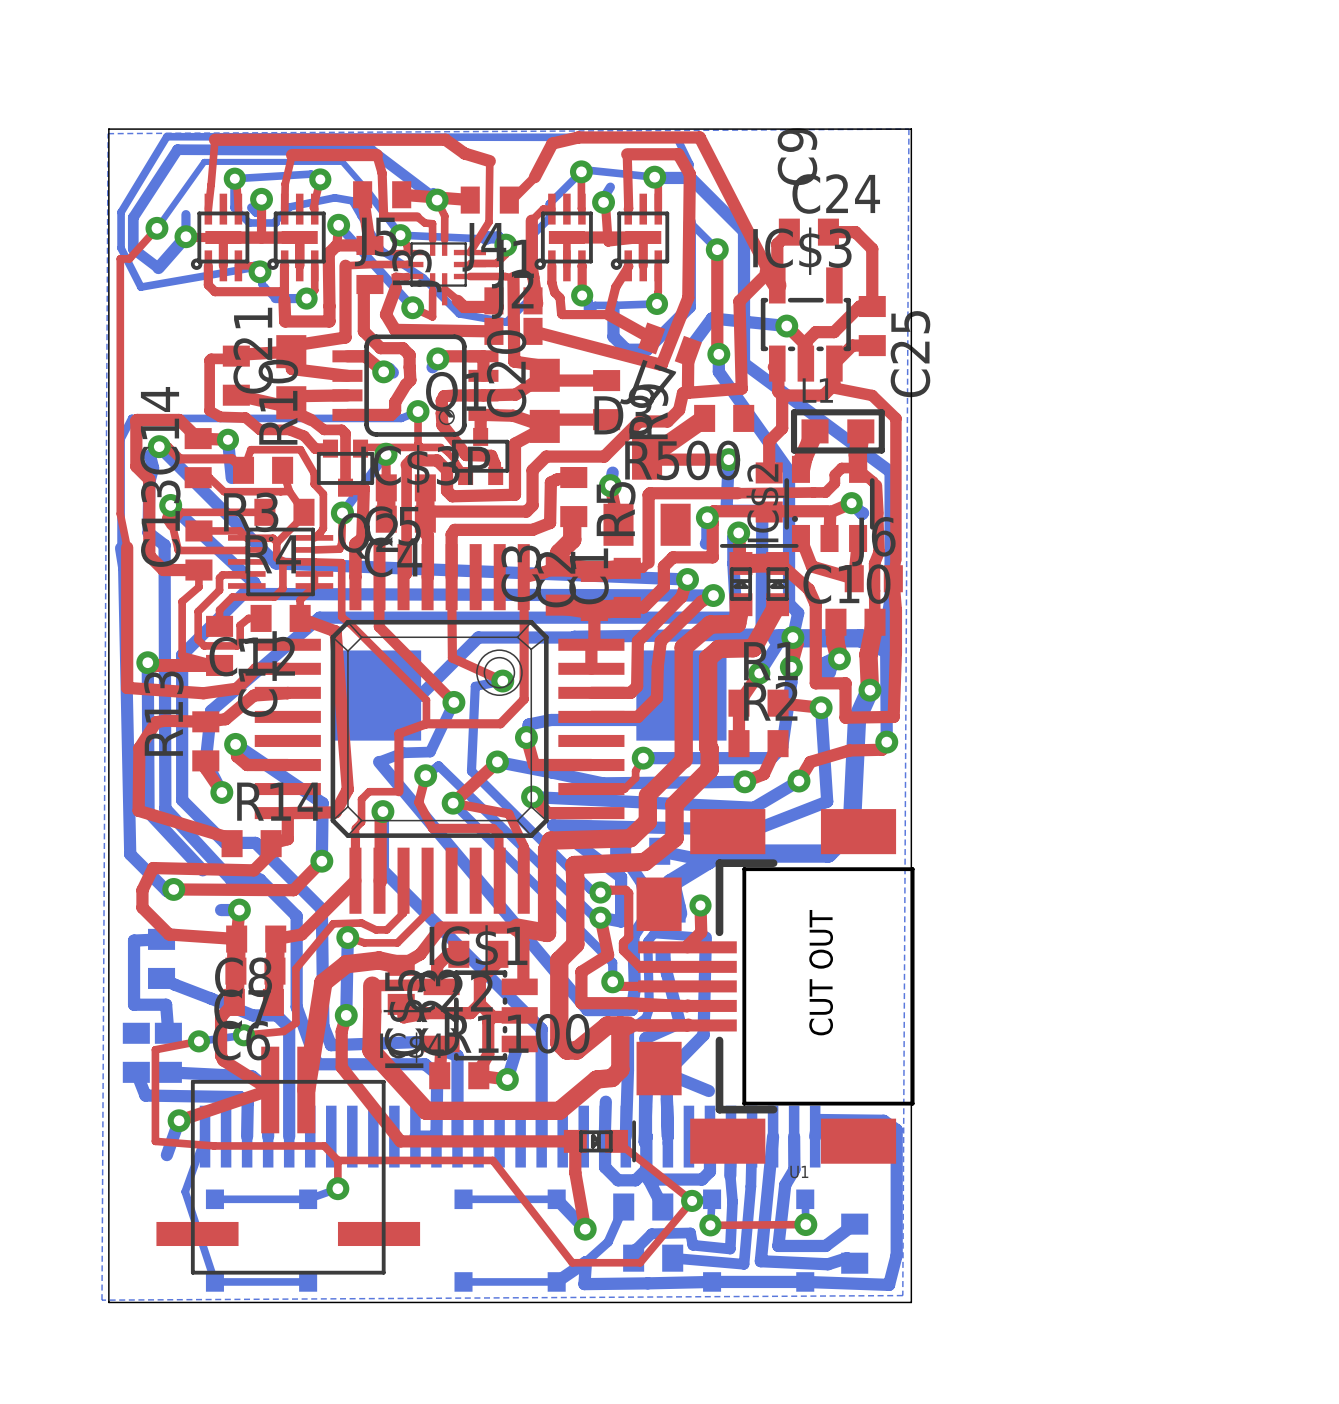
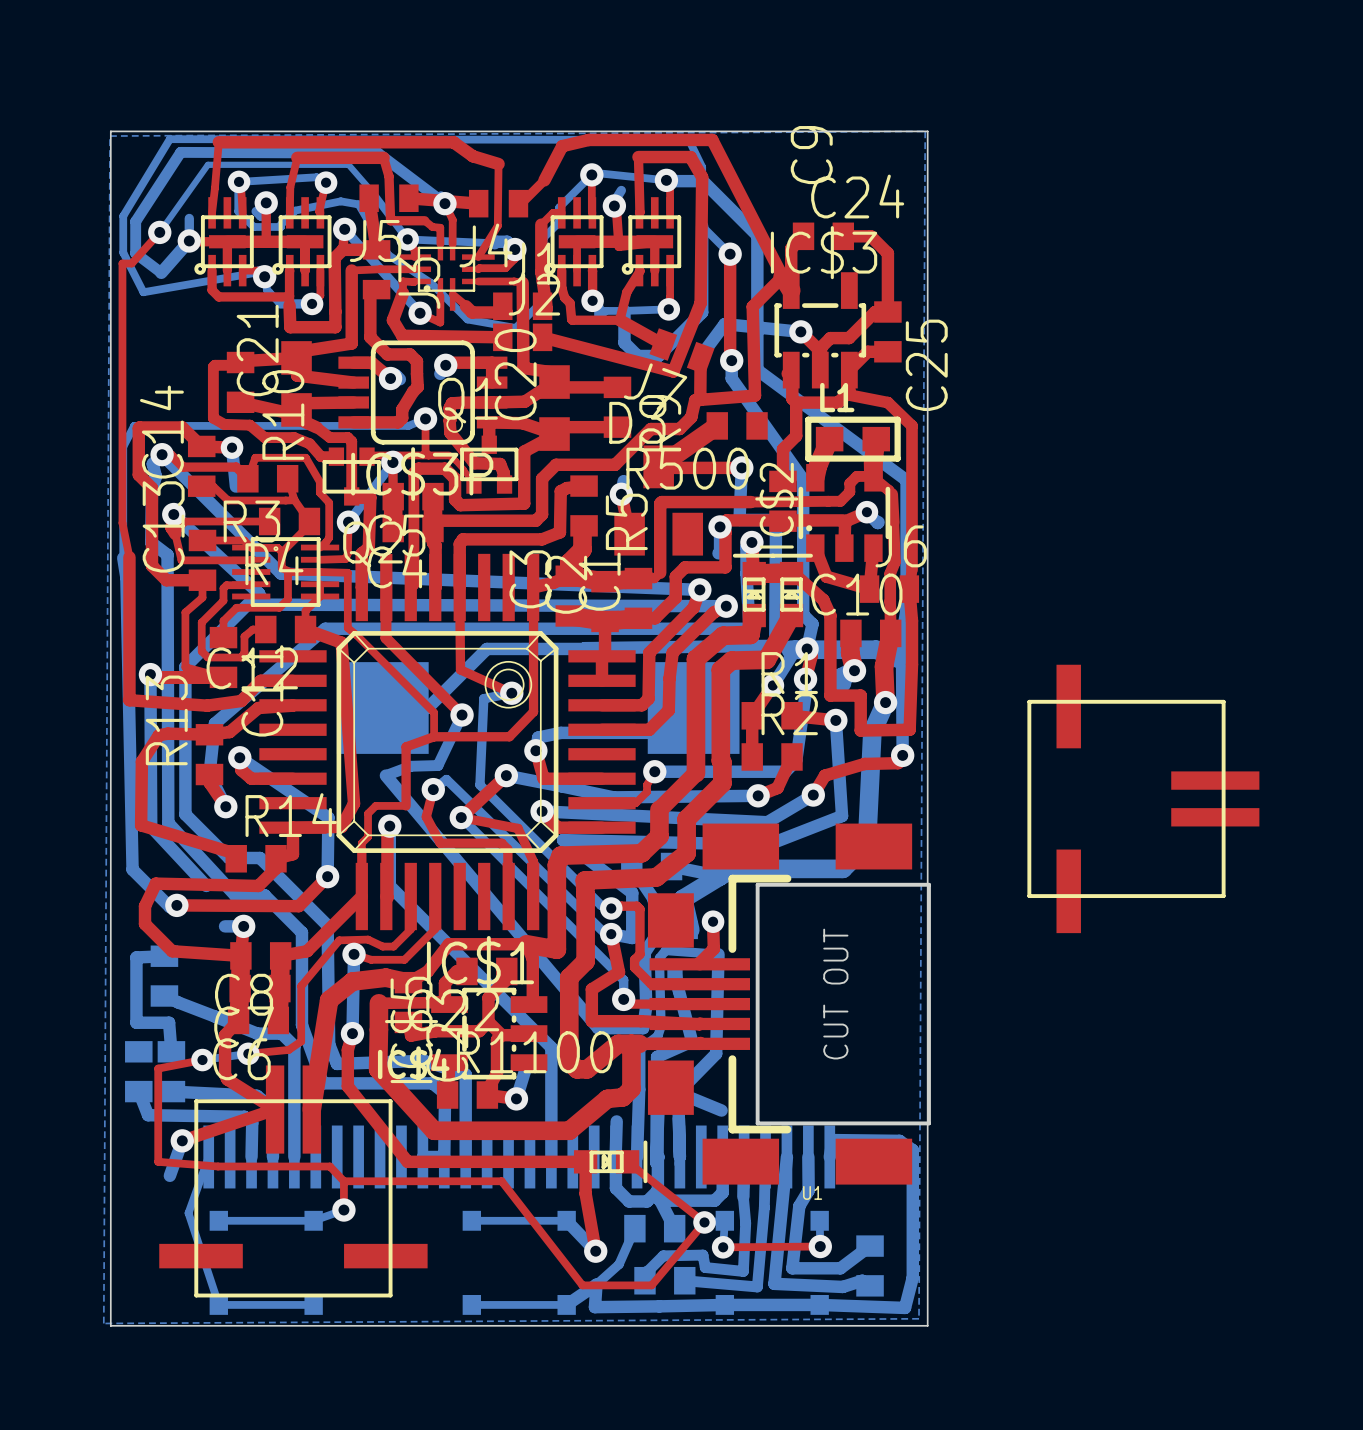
part: none -> (1143, 798)

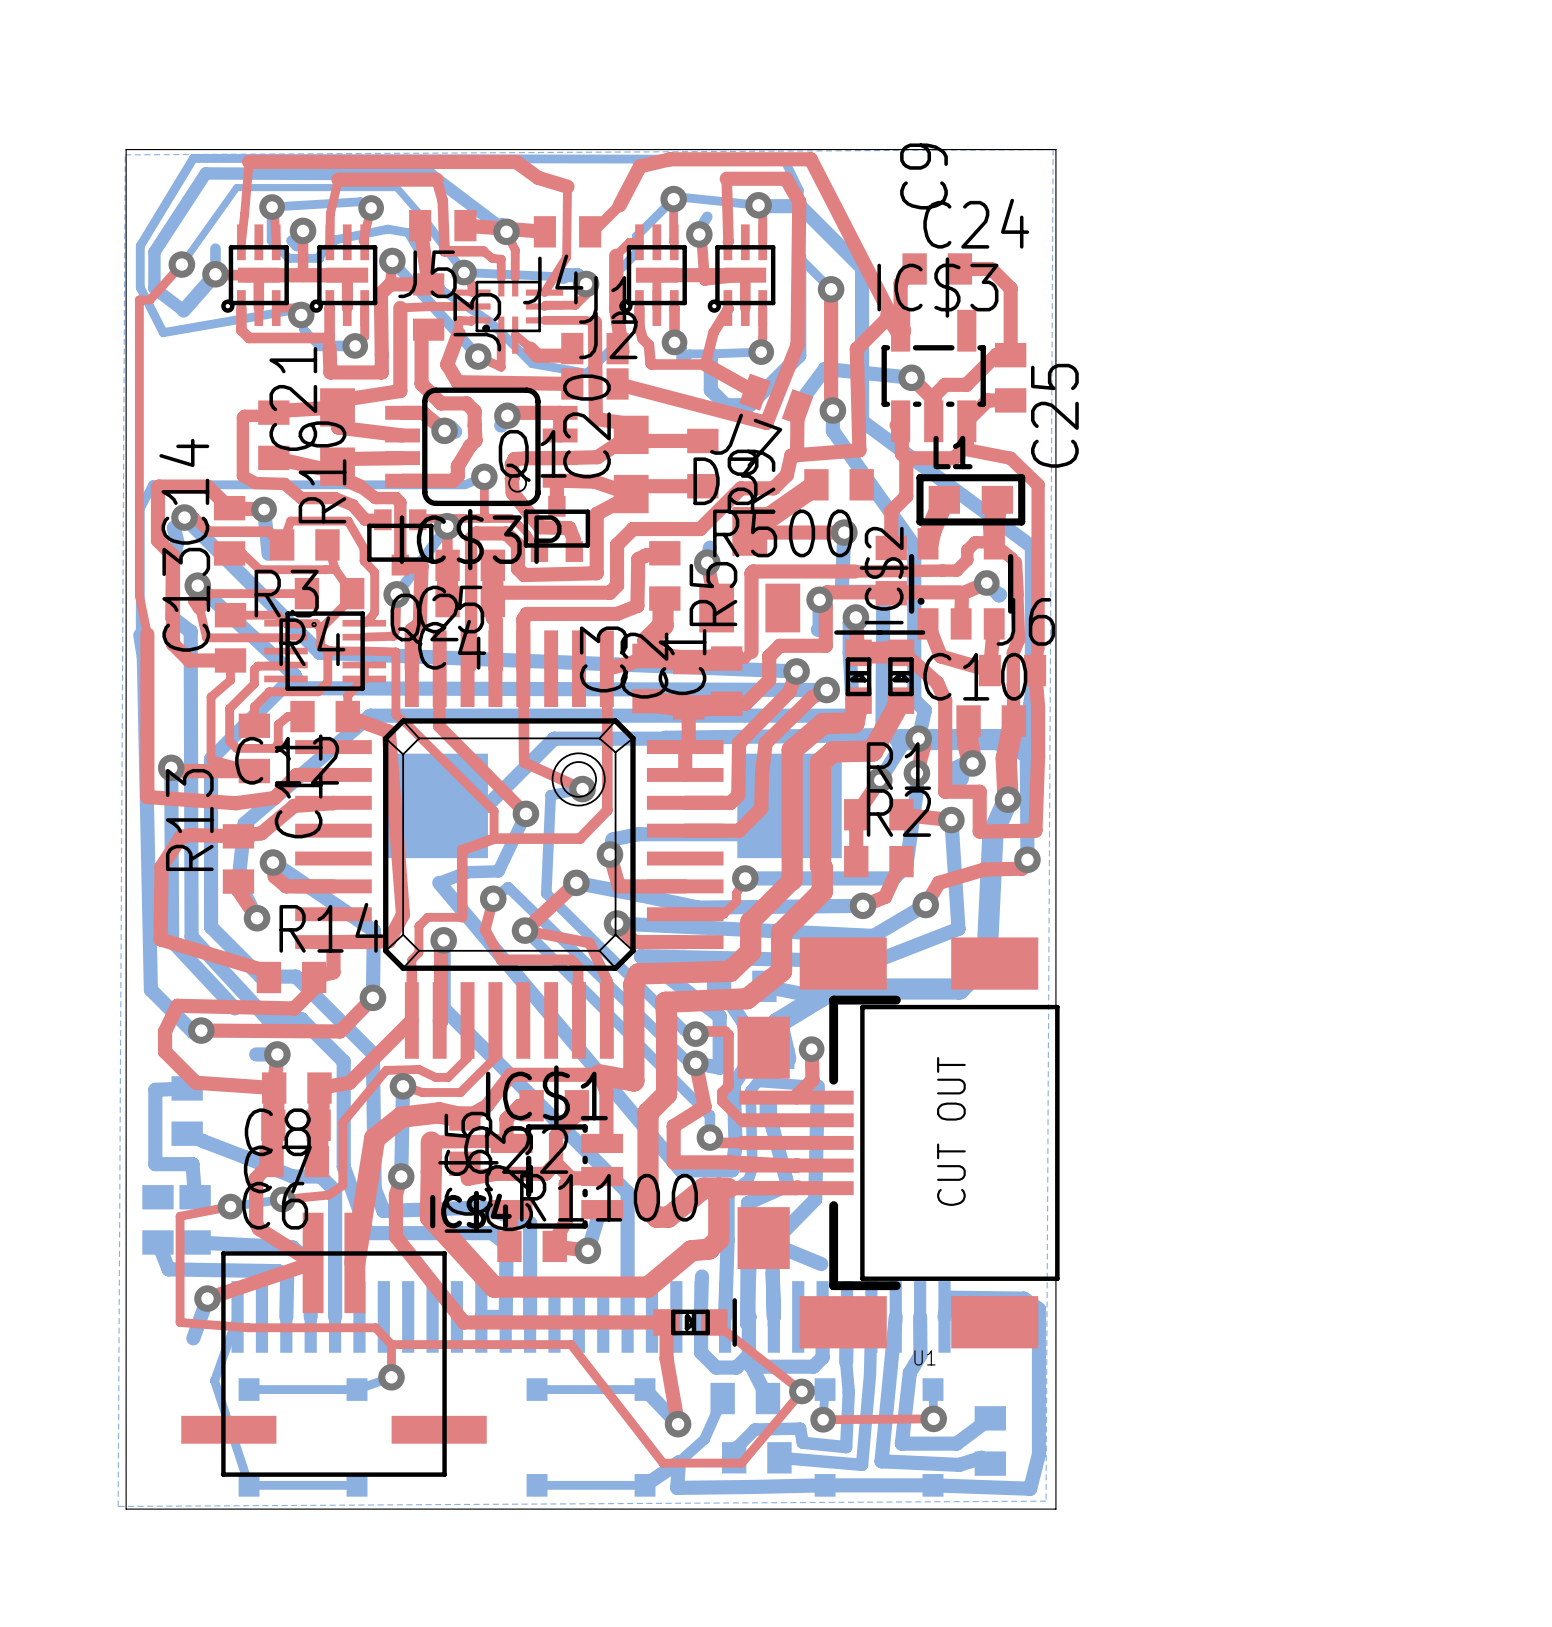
part: (1143, 798) -> none

